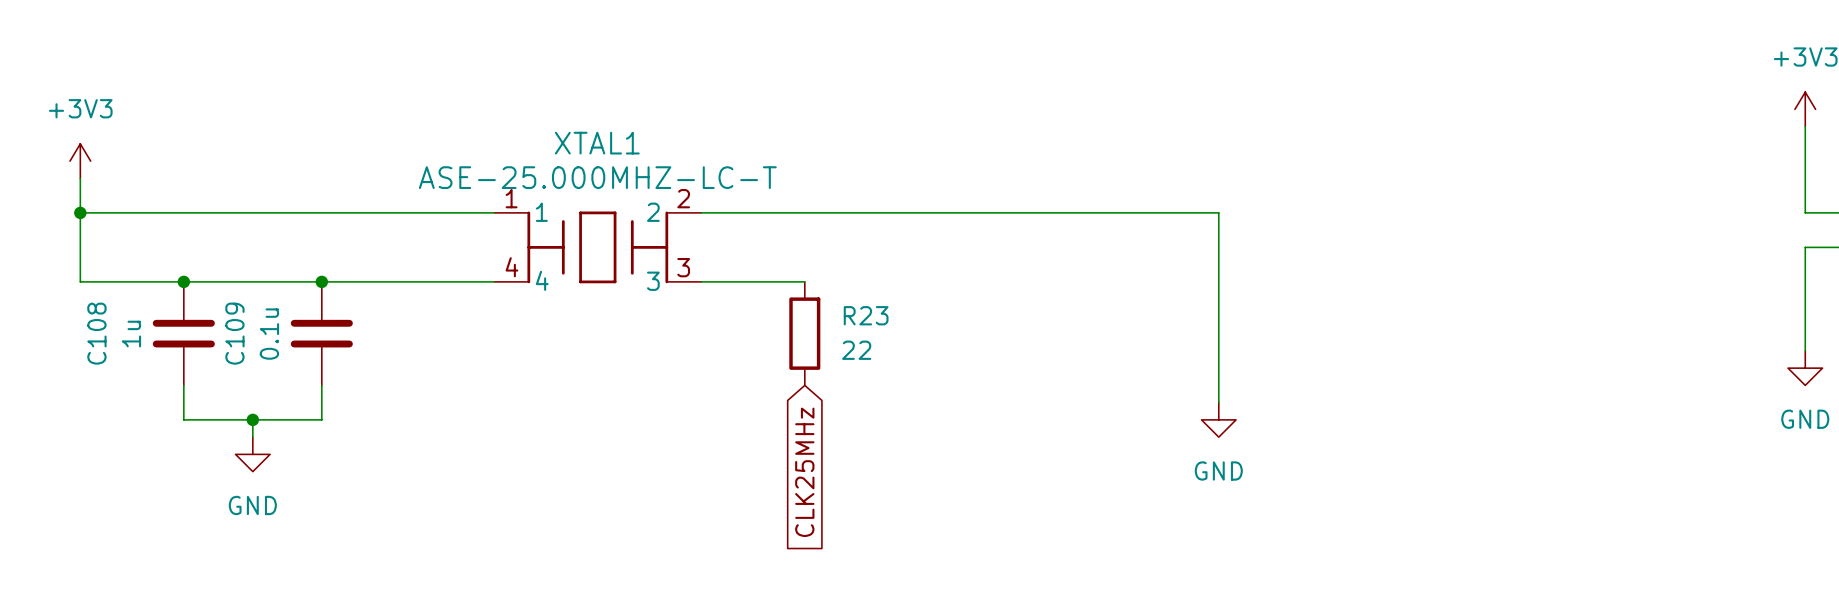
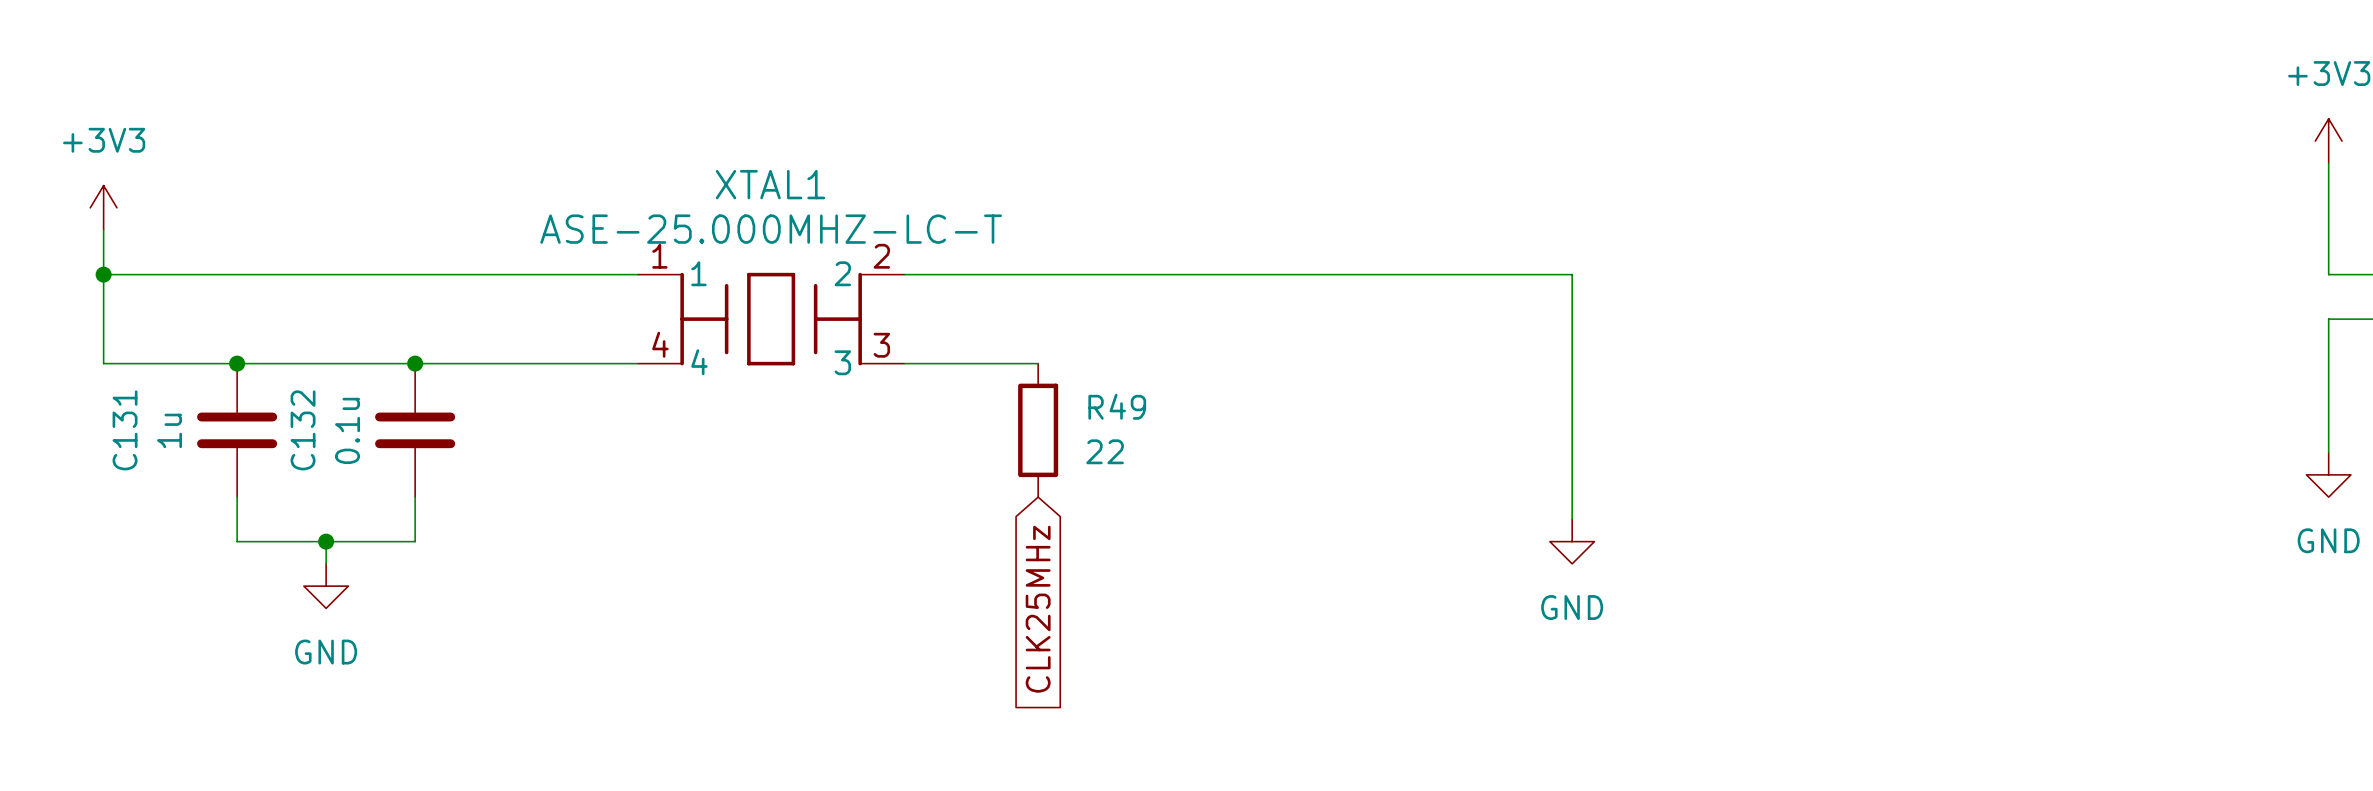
R23 name: R23 (866, 315) -> R49 (1117, 406)
C108 name: C108 (96, 333) -> C131 (125, 430)
C109 name: C109 (234, 333) -> C132 (303, 430)

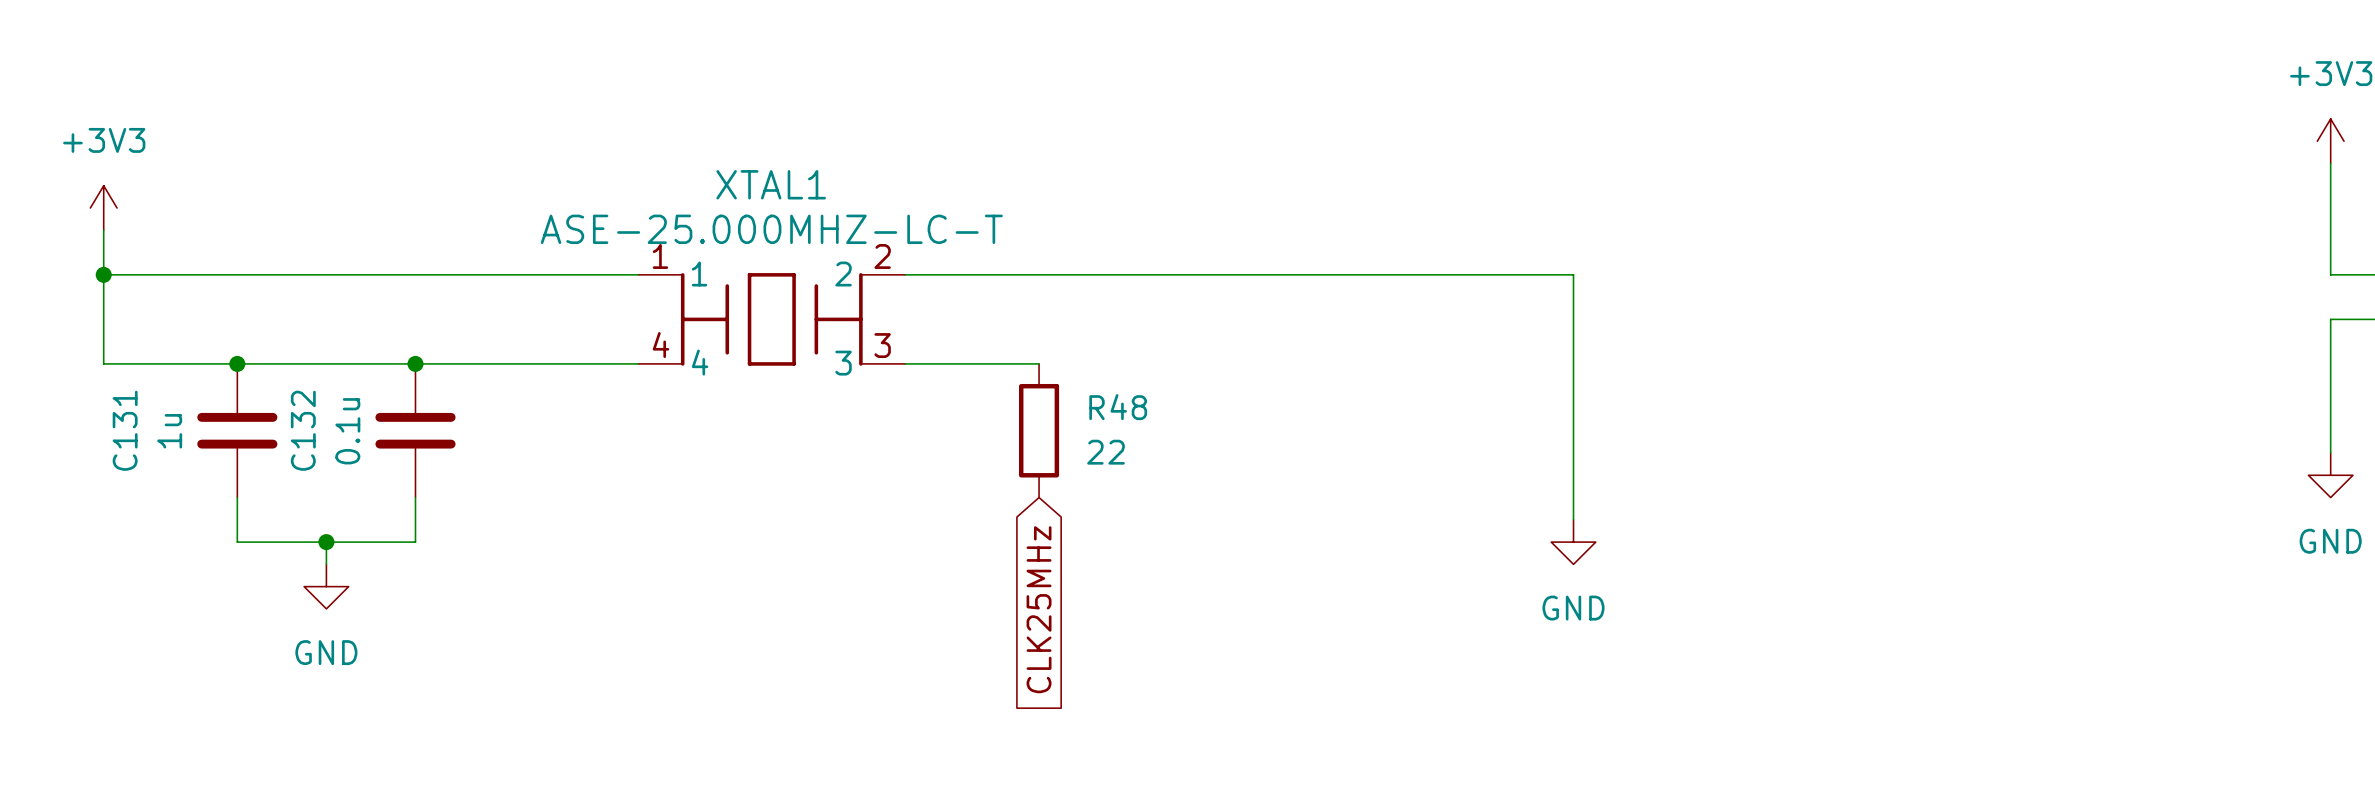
R49 name: R49 (1117, 406) -> R48 (1118, 407)

